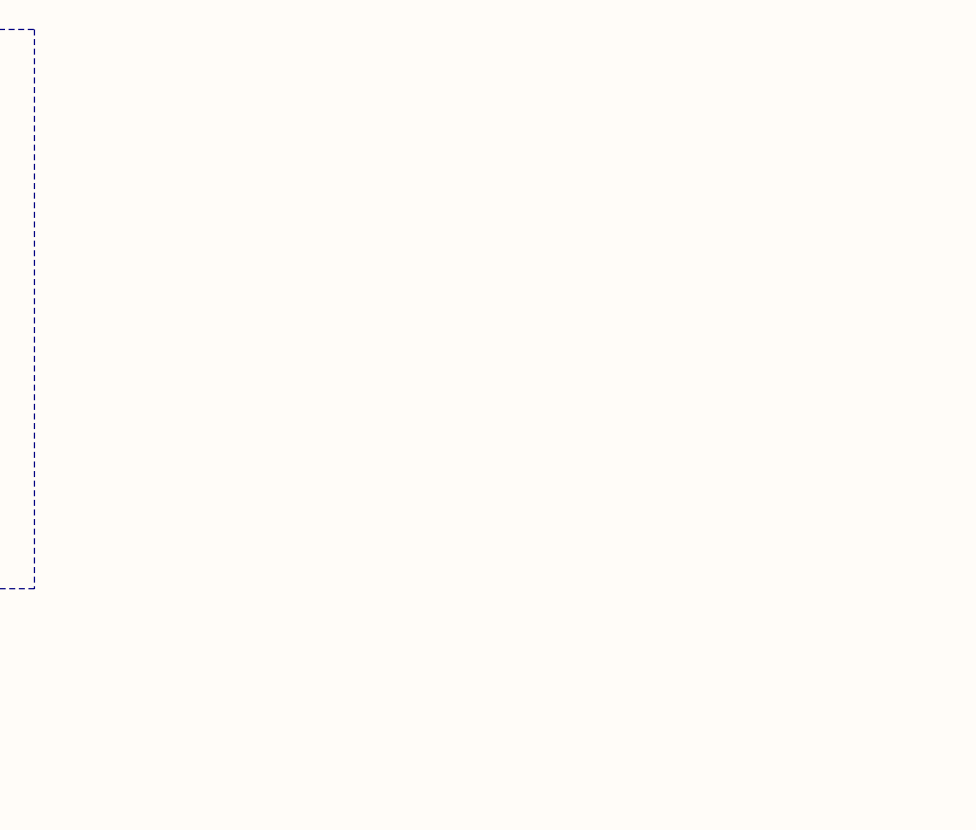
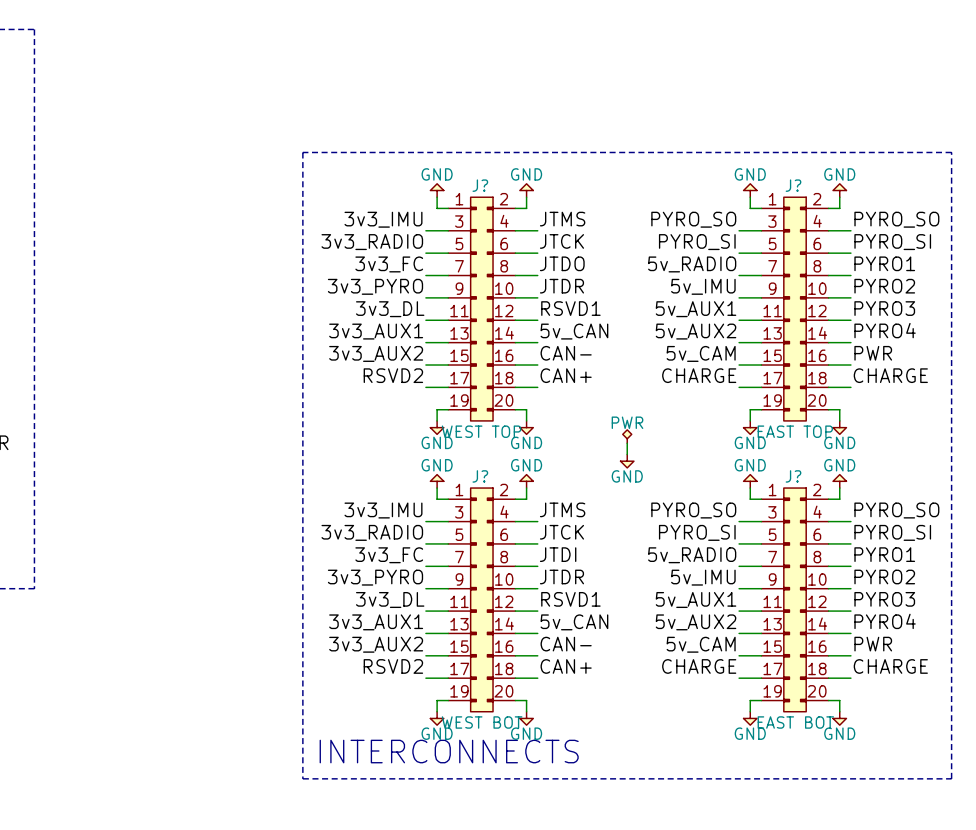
line: none -> (302, 152) (951, 152) (951, 778) (302, 778) (302, 152)
power symbol: none -> GND (437, 190)
power symbol: none -> GND (526, 190)
power symbol: none -> GND (750, 190)
power symbol: none -> GND (839, 190)
wire: none -> (437, 197) (437, 208) (448, 208)
wire: none -> (526, 197) (526, 208) (515, 208)
wire: none -> (750, 197) (750, 208) (761, 208)
wire: none -> (839, 197) (839, 208) (828, 208)
label: none -> 3v3_IMU (383, 219)
label: none -> JTMS (562, 219)
label: none -> PYRO_SO (693, 219)
label: none -> PYRO_SO (896, 219)
wire: none -> (425, 230) (448, 230)
wire: none -> (515, 230) (537, 230)
wire: none -> (739, 230) (761, 230)
wire: none -> (828, 230) (850, 230)
label: none -> 3v3_RADIO (372, 242)
label: none -> JTCK (561, 241)
label: none -> PYRO_SI (697, 242)
label: none -> PYRO_SI (892, 242)
wire: none -> (425, 253) (448, 253)
wire: none -> (515, 253) (537, 253)
wire: none -> (739, 253) (761, 253)
wire: none -> (828, 253) (850, 253)
label: none -> 3v3_FC (389, 264)
label: none -> JTDO (562, 263)
label: none -> 5v_RADIO (692, 264)
label: none -> PYRO1 (884, 263)
wire: none -> (425, 275) (448, 275)
wire: none -> (515, 275) (537, 275)
wire: none -> (739, 275) (761, 275)
wire: none -> (828, 275) (850, 275)
label: none -> 3v3_PYRO (375, 286)
label: none -> JTDR (561, 286)
label: none -> 5v_IMU (703, 286)
label: none -> PYRO2 (884, 286)
wire: none -> (425, 297) (448, 297)
wire: none -> (515, 297) (537, 297)
wire: none -> (739, 297) (761, 297)
wire: none -> (828, 297) (850, 297)
label: none -> 3v3_DL (390, 309)
label: none -> RSVD1 (570, 308)
label: none -> 5v_AUX1 (696, 309)
label: none -> PYRO3 (884, 308)
J?: none -> WEST TOP (481, 309)
J?: none -> EAST TOP (795, 309)
wire: none -> (425, 320) (448, 320)
wire: none -> (515, 320) (537, 320)
wire: none -> (739, 320) (761, 320)
wire: none -> (828, 320) (850, 320)
label: none -> 5v_CAN (574, 331)
label: none -> 5v_AUX2 (696, 331)
label: none -> PYRO4 (885, 330)
label: none -> 3v3_AUX1 (376, 331)
wire: none -> (425, 342) (448, 342)
wire: none -> (515, 342) (537, 342)
wire: none -> (739, 342) (761, 342)
wire: none -> (828, 342) (850, 342)
label: none -> 3v3_AUX2 (376, 353)
label: none -> CAN- (566, 353)
label: none -> 5v_CAM (701, 353)
label: none -> PWR (873, 353)
wire: none -> (425, 365) (448, 365)
wire: none -> (515, 365) (537, 365)
wire: none -> (739, 365) (761, 365)
wire: none -> (828, 365) (850, 365)
label: none -> RSVD2 (393, 375)
label: none -> CAN+ (566, 375)
label: none -> CHARGE (699, 375)
label: none -> CHARGE (890, 375)
wire: none -> (425, 387) (448, 387)
wire: none -> (515, 387) (537, 387)
wire: none -> (739, 387) (761, 387)
wire: none -> (828, 387) (850, 387)
wire: none -> (448, 409) (437, 409) (437, 420)
wire: none -> (515, 409) (526, 409) (526, 420)
wire: none -> (761, 409) (750, 409) (750, 420)
wire: none -> (828, 409) (839, 409) (839, 420)
power symbol: none -> GND (437, 427)
power symbol: none -> GND (526, 427)
power symbol: none -> GND (750, 427)
power symbol: none -> GND (839, 427)
power symbol: none -> PWR (627, 436)
wire: none -> (627, 443) (627, 454)
power symbol: none -> GND (627, 461)
power symbol: none -> GND (437, 481)
power symbol: none -> GND (526, 481)
power symbol: none -> GND (750, 481)
power symbol: none -> GND (839, 481)
wire: none -> (437, 488) (437, 499) (448, 499)
wire: none -> (526, 488) (526, 499) (515, 499)
wire: none -> (750, 488) (750, 499) (761, 499)
wire: none -> (839, 488) (839, 499) (828, 499)
label: none -> 3v3_IMU (383, 510)
label: none -> JTMS (562, 509)
label: none -> PYRO_SO (693, 510)
label: none -> PYRO_SO (896, 510)
wire: none -> (425, 521) (448, 521)
wire: none -> (515, 521) (537, 521)
wire: none -> (739, 521) (761, 521)
wire: none -> (828, 521) (850, 521)
label: none -> 3v3_RADIO (372, 532)
label: none -> JTCK (561, 532)
label: none -> PYRO_SI (697, 532)
label: none -> PYRO_SI (892, 532)
wire: none -> (425, 543) (448, 543)
wire: none -> (515, 543) (537, 543)
wire: none -> (739, 543) (761, 543)
wire: none -> (828, 543) (850, 543)
label: none -> 3v3_FC (389, 555)
label: none -> JTDI (558, 554)
label: none -> 5v_RADIO (692, 555)
label: none -> PYRO1 (884, 554)
wire: none -> (425, 566) (448, 566)
wire: none -> (515, 566) (537, 566)
wire: none -> (739, 566) (761, 566)
wire: none -> (828, 566) (850, 566)
label: none -> 3v3_PYRO (375, 577)
label: none -> PYRO2 (884, 576)
label: none -> JTDR (561, 576)
label: none -> 5v_IMU (703, 577)
wire: none -> (425, 588) (448, 588)
wire: none -> (515, 588) (537, 588)
wire: none -> (739, 588) (761, 588)
wire: none -> (828, 588) (850, 588)
label: none -> 3v3_DL (390, 600)
J?: none -> WEST BOT (481, 599)
label: none -> RSVD1 (570, 599)
label: none -> 5v_AUX1 (696, 600)
J?: none -> EAST BOT (795, 599)
label: none -> PYRO3 (884, 599)
wire: none -> (425, 611) (448, 611)
wire: none -> (515, 611) (537, 611)
wire: none -> (739, 611) (761, 611)
wire: none -> (828, 611) (850, 611)
label: none -> 3v3_AUX1 (376, 622)
label: none -> 5v_CAN (574, 622)
label: none -> 5v_AUX2 (696, 622)
label: none -> PYRO4 (885, 621)
wire: none -> (425, 633) (448, 633)
wire: none -> (515, 633) (537, 633)
wire: none -> (739, 633) (761, 633)
wire: none -> (828, 633) (850, 633)
label: none -> 3v3_AUX2 (376, 644)
label: none -> CAN- (566, 644)
label: none -> 5v_CAM (701, 644)
label: none -> PWR (873, 644)
wire: none -> (425, 655) (448, 655)
wire: none -> (515, 655) (537, 655)
wire: none -> (739, 655) (761, 655)
wire: none -> (828, 655) (850, 655)
label: none -> RSVD2 (393, 666)
label: none -> CAN+ (566, 666)
label: none -> CHARGE (699, 666)
label: none -> CHARGE (890, 666)
wire: none -> (425, 678) (448, 678)
wire: none -> (515, 678) (537, 678)
wire: none -> (739, 678) (761, 678)
wire: none -> (828, 678) (850, 678)
wire: none -> (448, 700) (437, 700) (437, 711)
wire: none -> (515, 700) (526, 700) (526, 711)
wire: none -> (761, 700) (750, 700) (750, 711)
wire: none -> (828, 700) (839, 700) (839, 711)
power symbol: none -> GND (437, 718)
power symbol: none -> GND (526, 718)
power symbol: none -> GND (750, 718)
power symbol: none -> GND (839, 718)
text: none -> INTERCONNECTS (449, 751)

